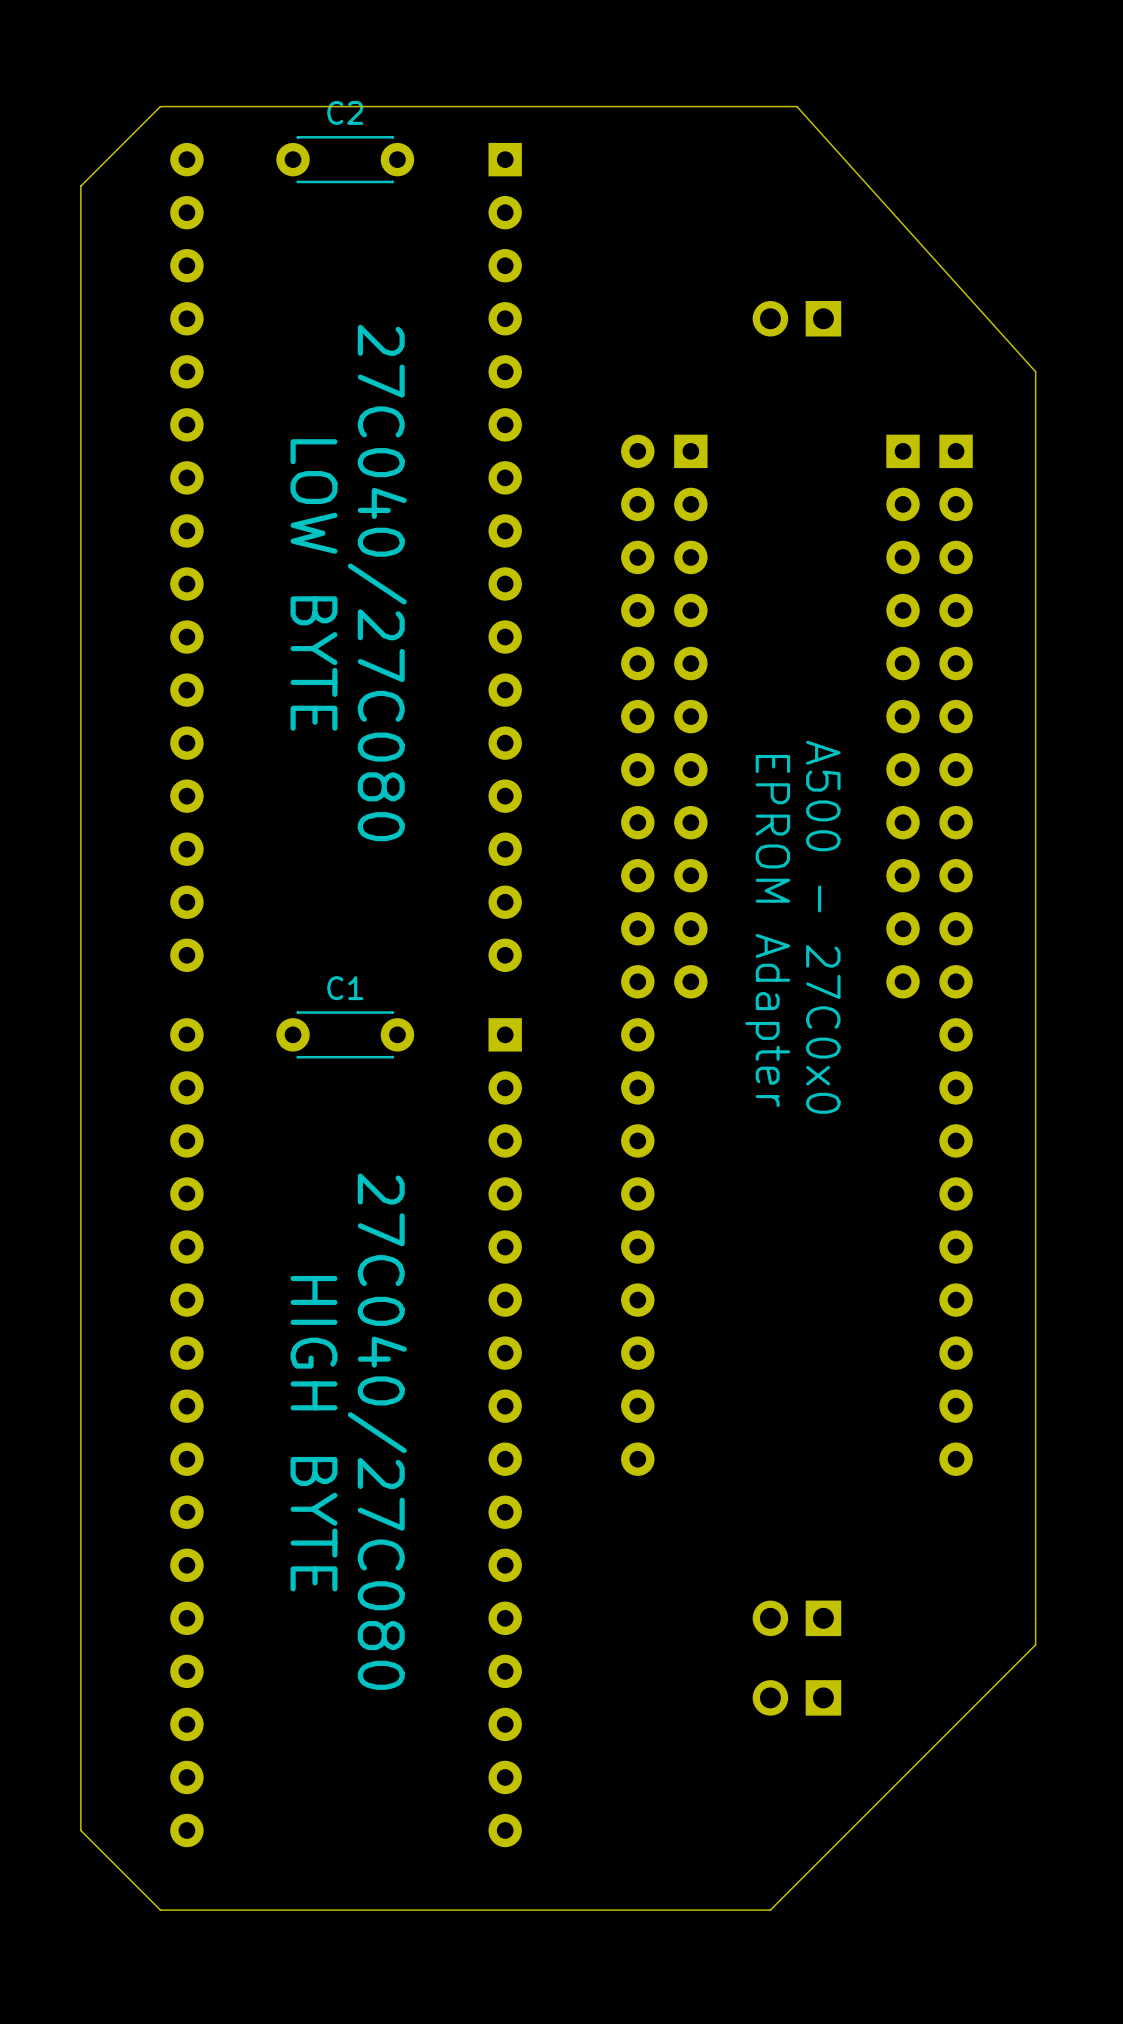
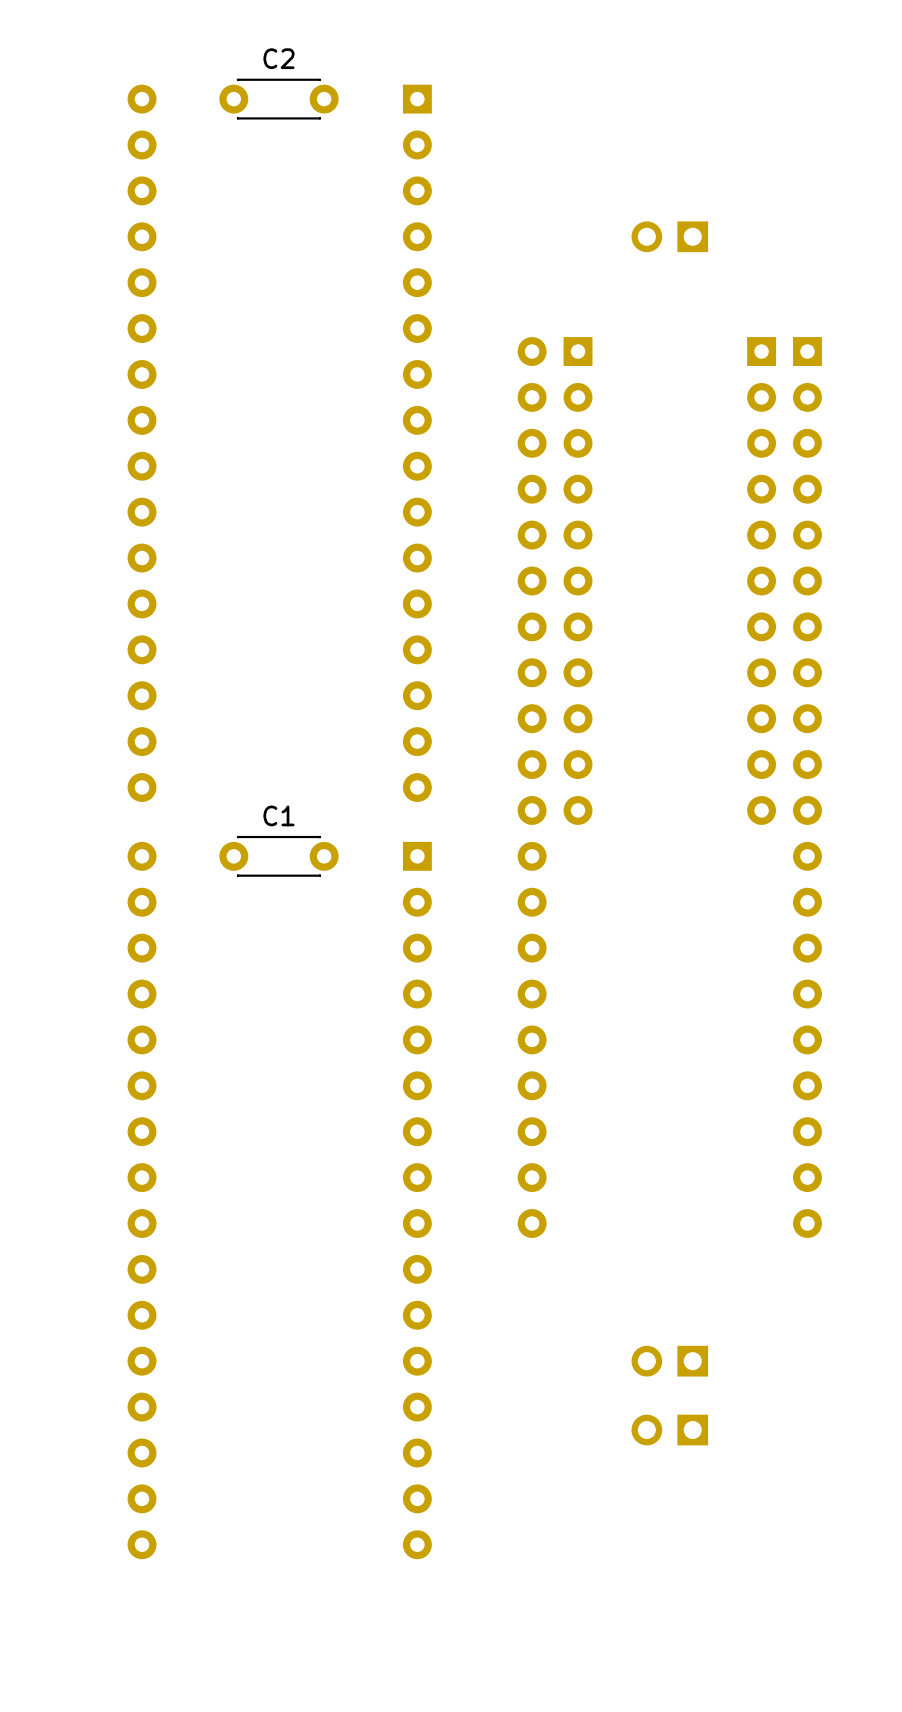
board edge: (796, 106) (1035, 371) (1035, 1644) (770, 1910) (160, 1910) (80, 1830) (80, 186) (160, 106) (796, 106) -> none
text: 27C040/27C080 (377, 582) -> none
text: LOW BYTE (314, 584) -> none
text: A500 - 27C0x0 (823, 927) -> none
text: EPROM Adapter (767, 931) -> none
text: 27C040/27C080 (377, 1431) -> none
text: HIGH BYTE (314, 1433) -> none

